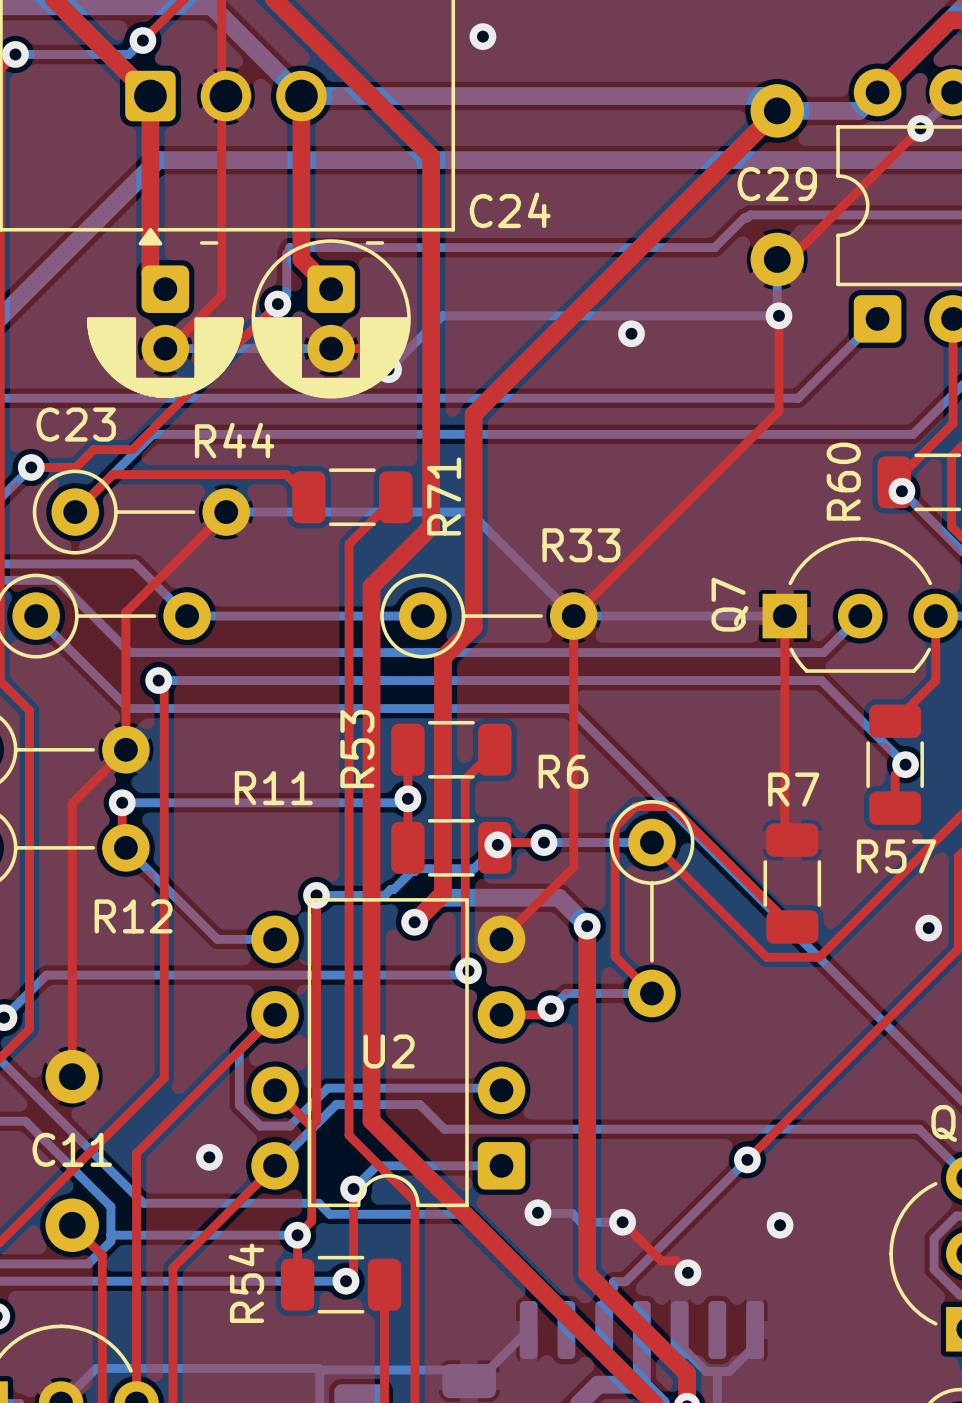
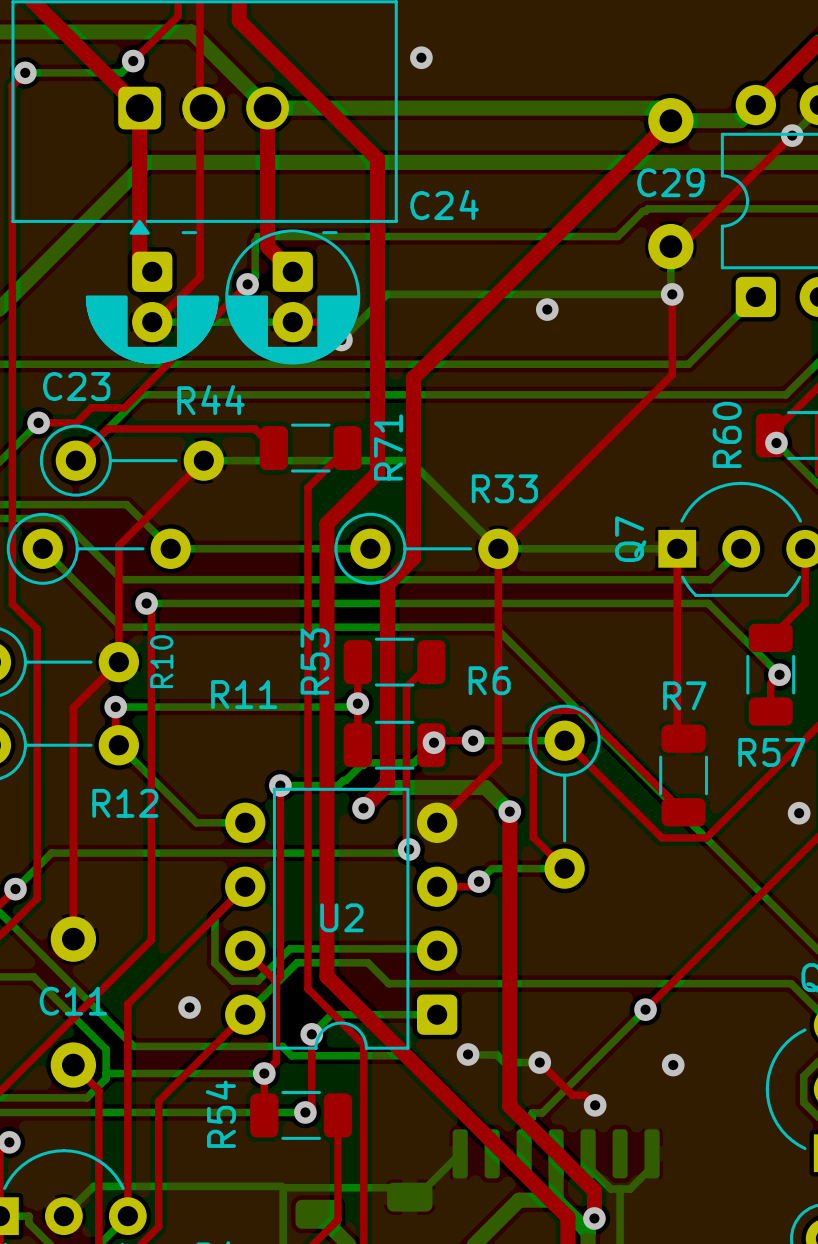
R10 name: none -> R10 (161, 661)

